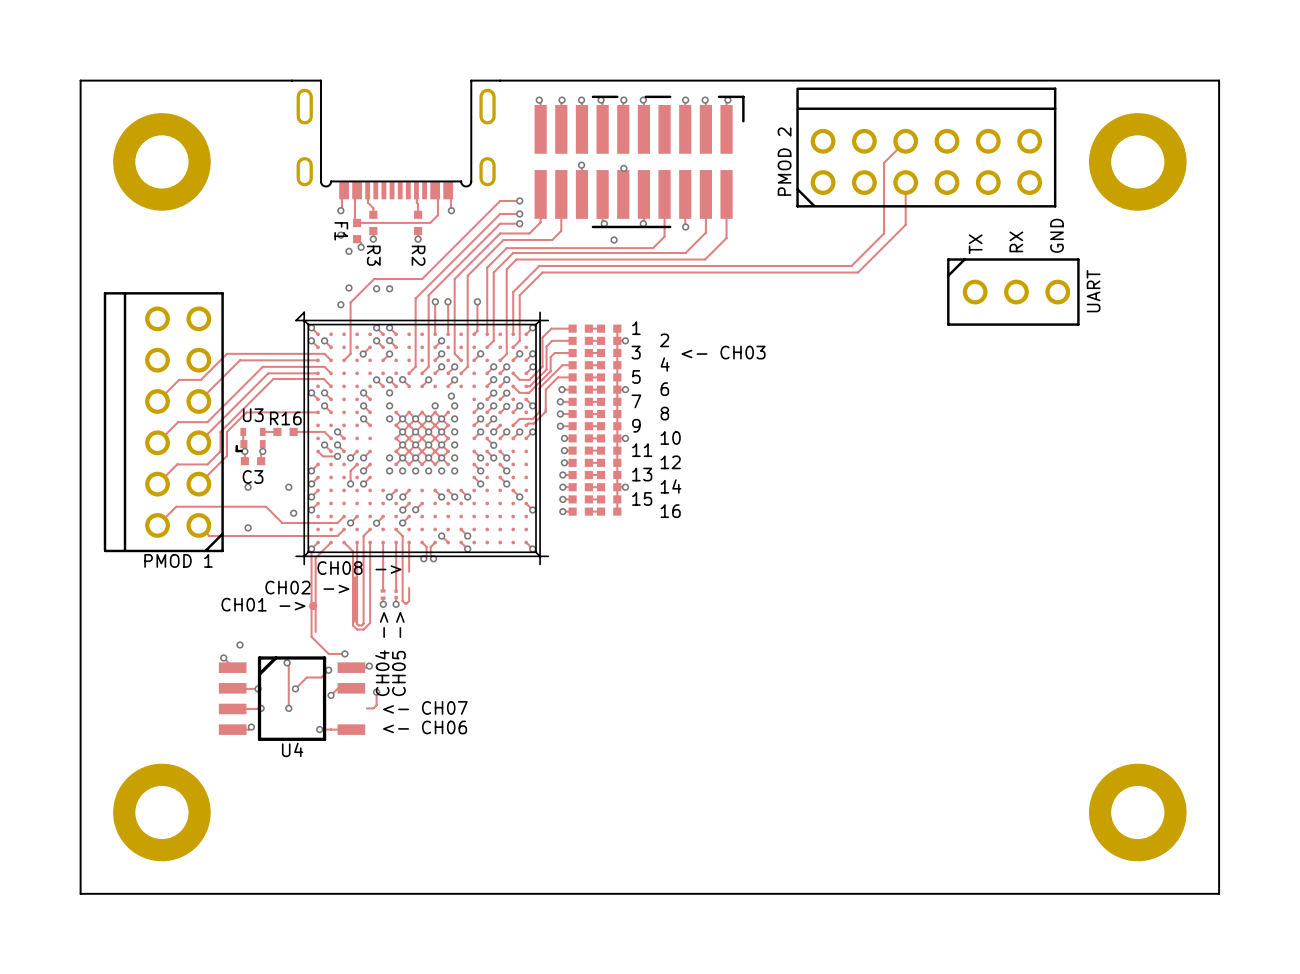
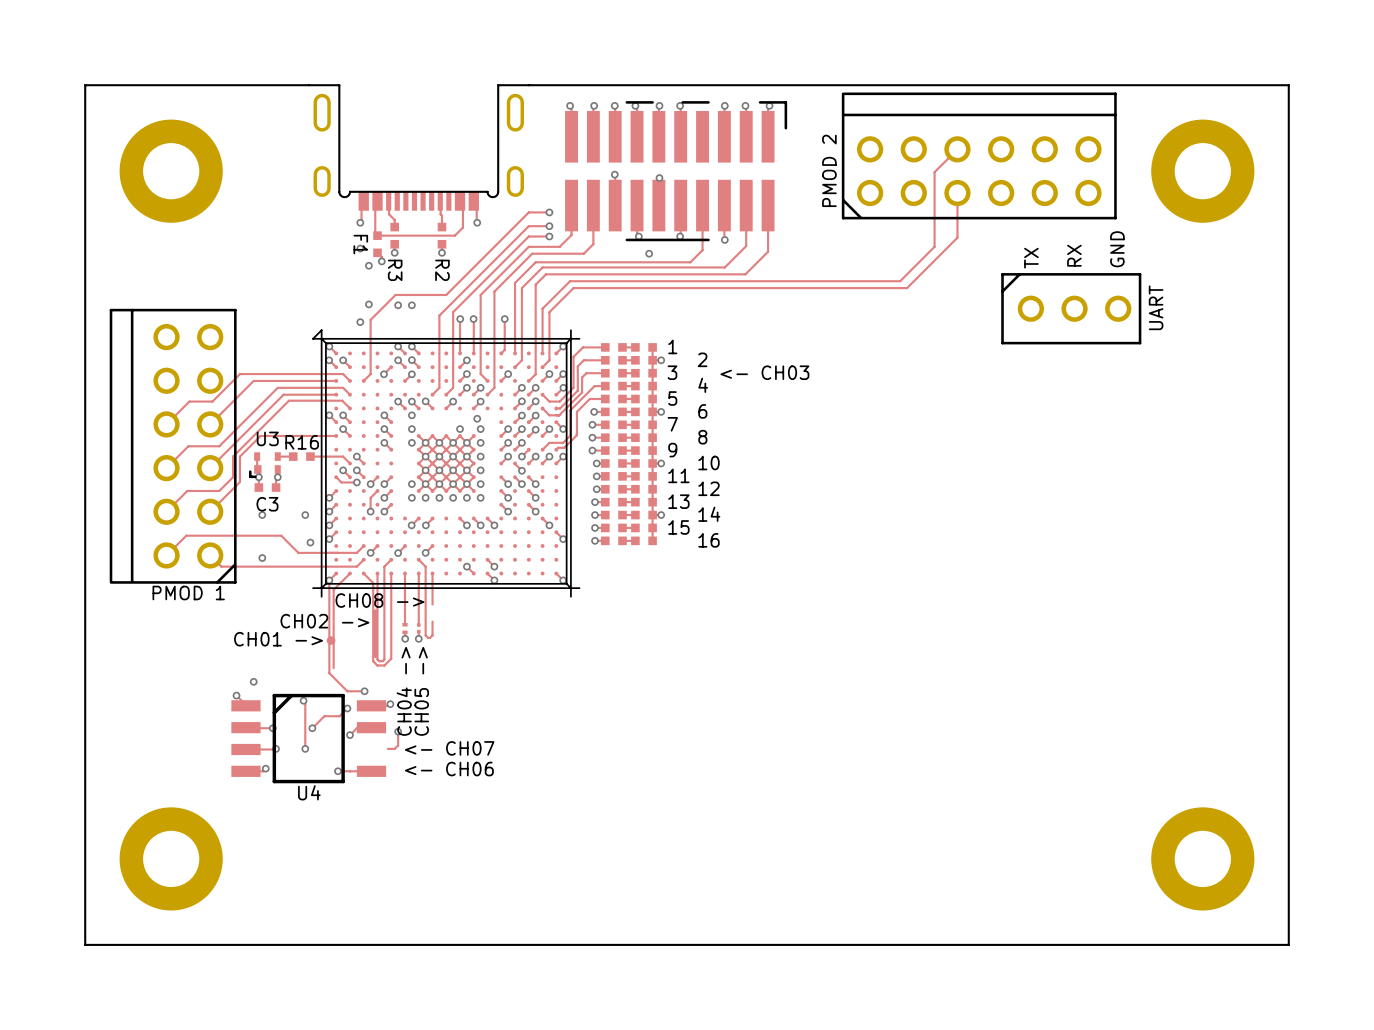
track: (409, 503) (402, 509) -> none
track: (421, 503) (415, 509) -> none
via: (402, 509) -> none
via: (415, 509) -> none
track: (422, 542) (426, 546) (426, 555) (423, 558) -> none
track: (435, 542) (430, 546) (430, 555) (433, 558) -> none
via: (423, 558) -> none
via: (433, 558) -> none

